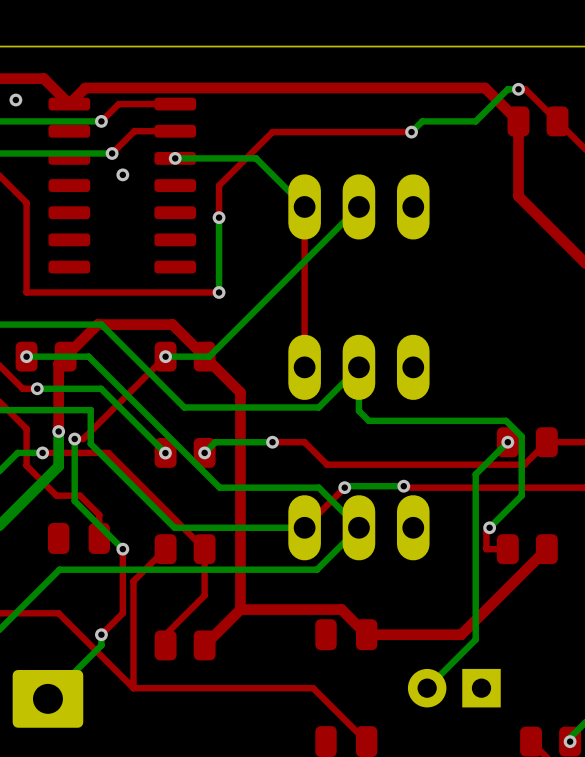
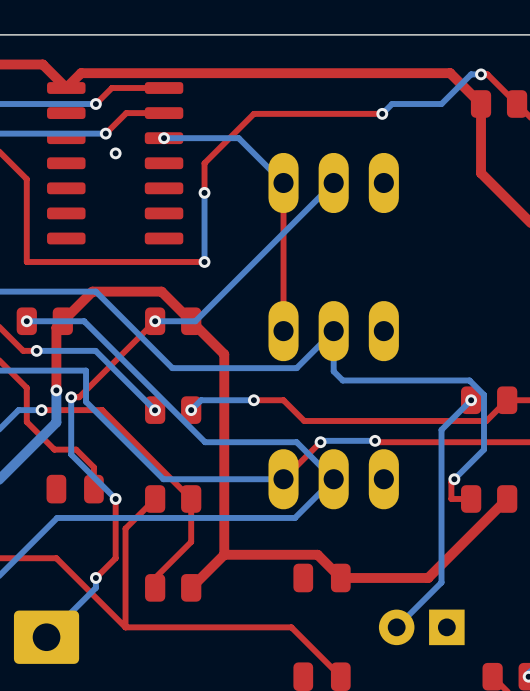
via: (15, 100) -> none

